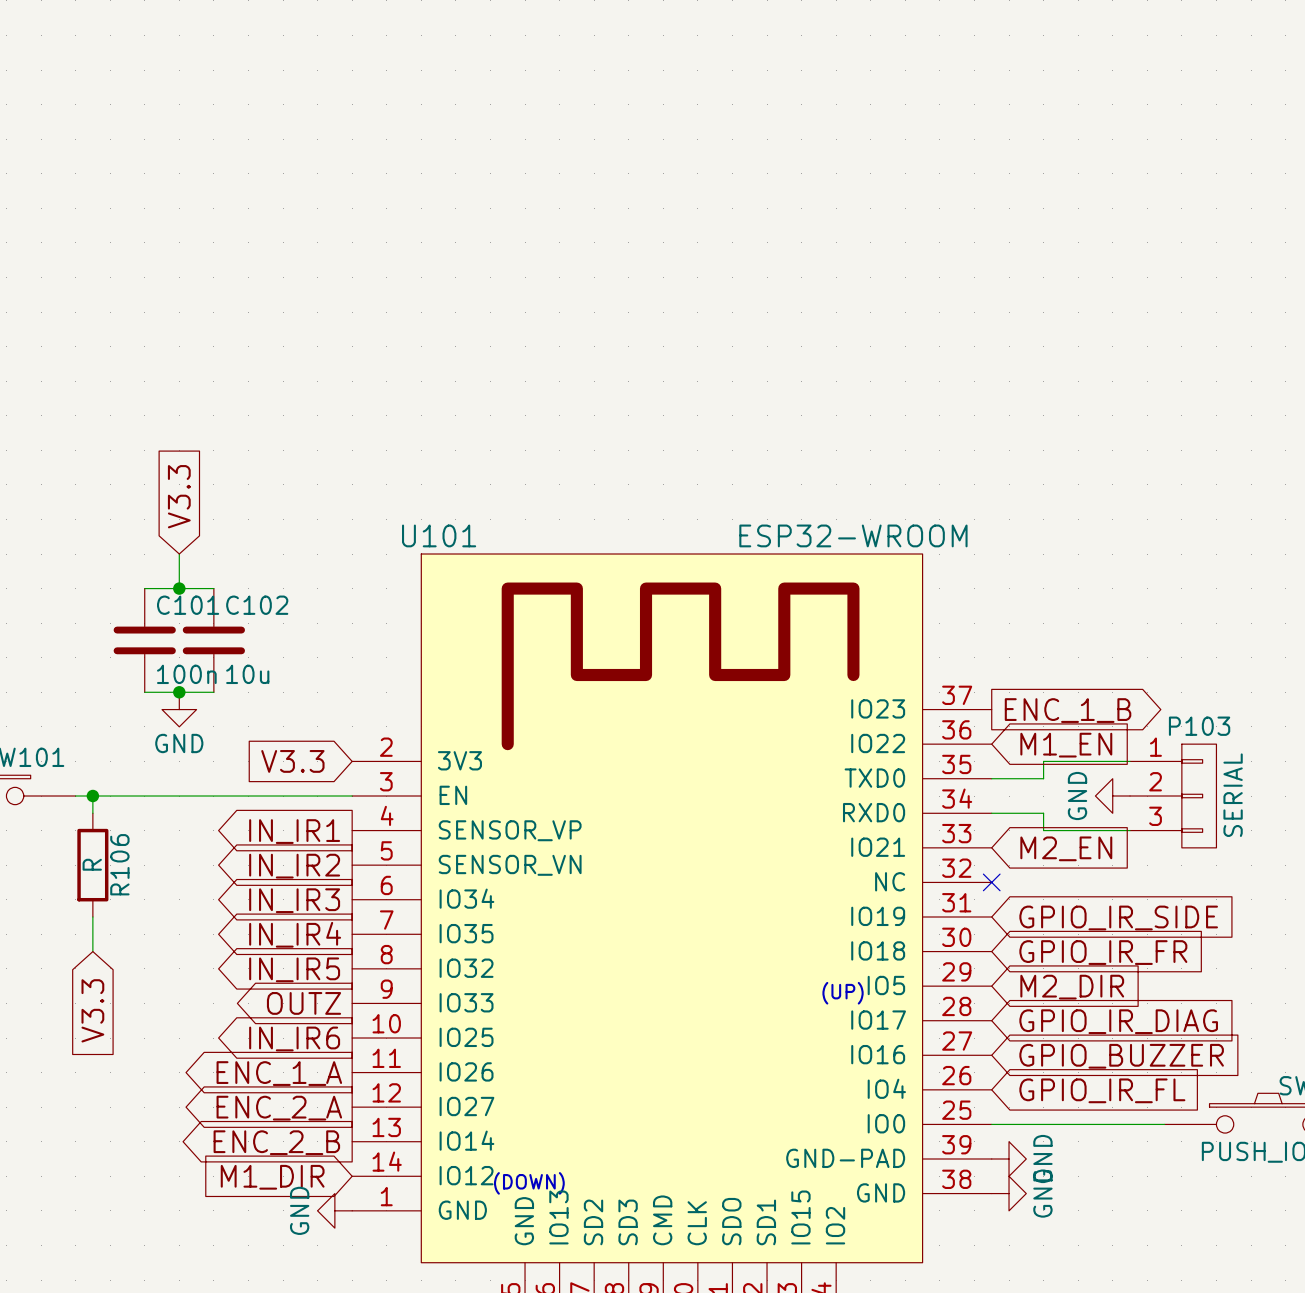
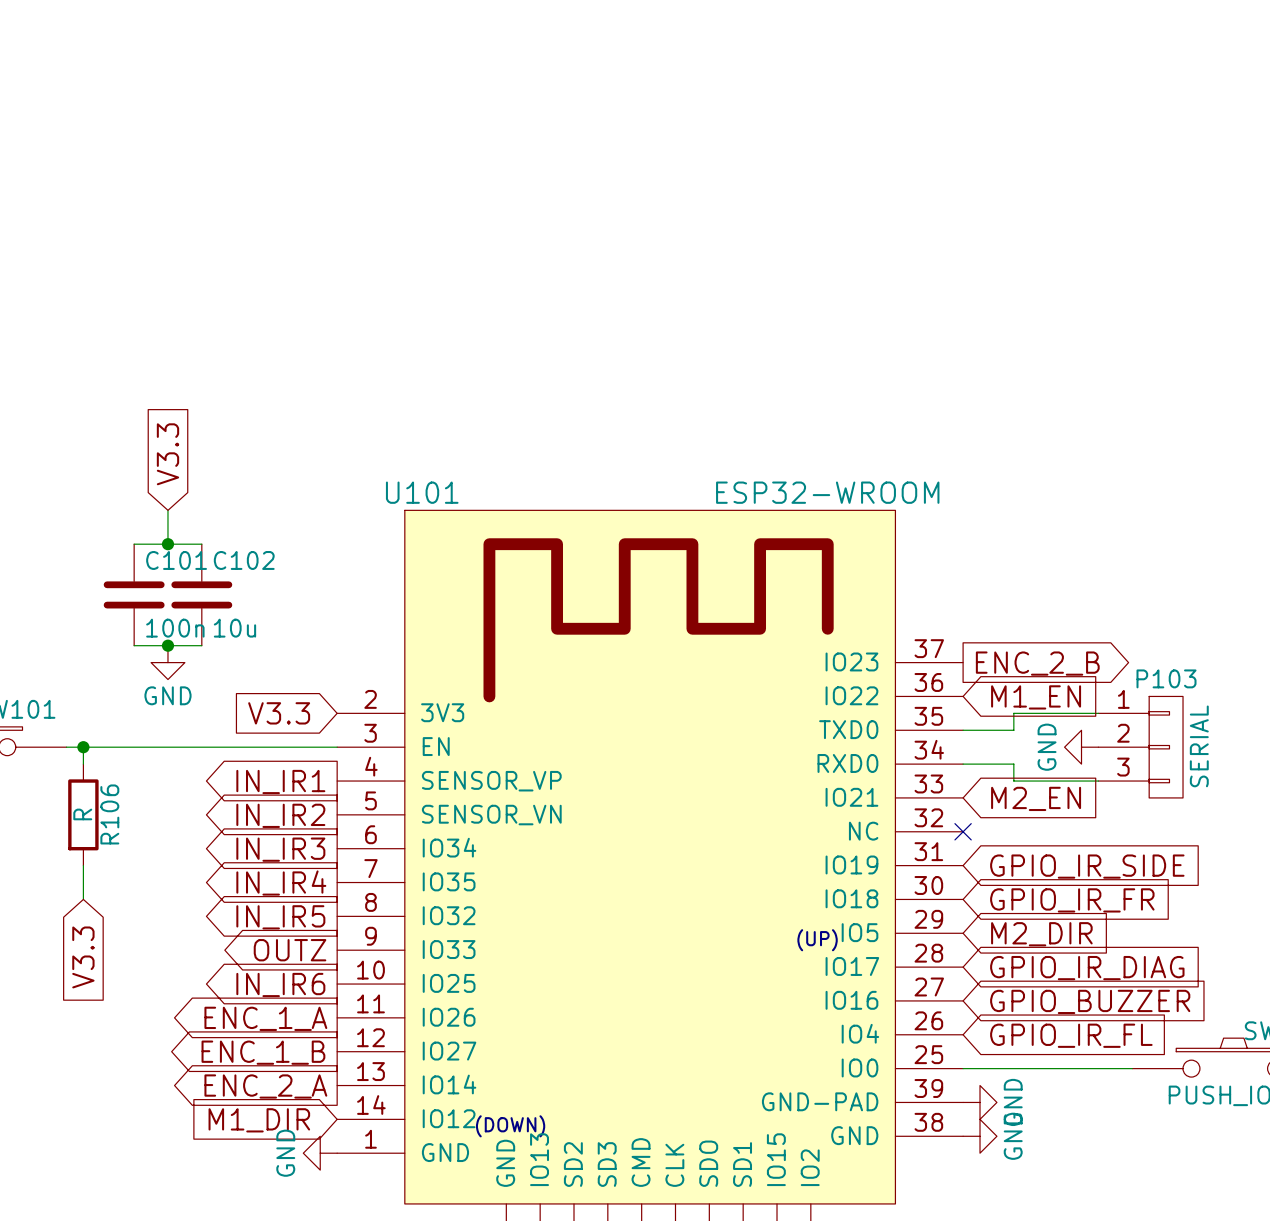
global label: ENC_1_B (1068, 710) -> ENC_2_B (1037, 663)
global label: ENC_2_A (279, 1108) -> ENC_1_B (263, 1052)
global label: ENC_2_B (276, 1142) -> ENC_2_A (265, 1086)

